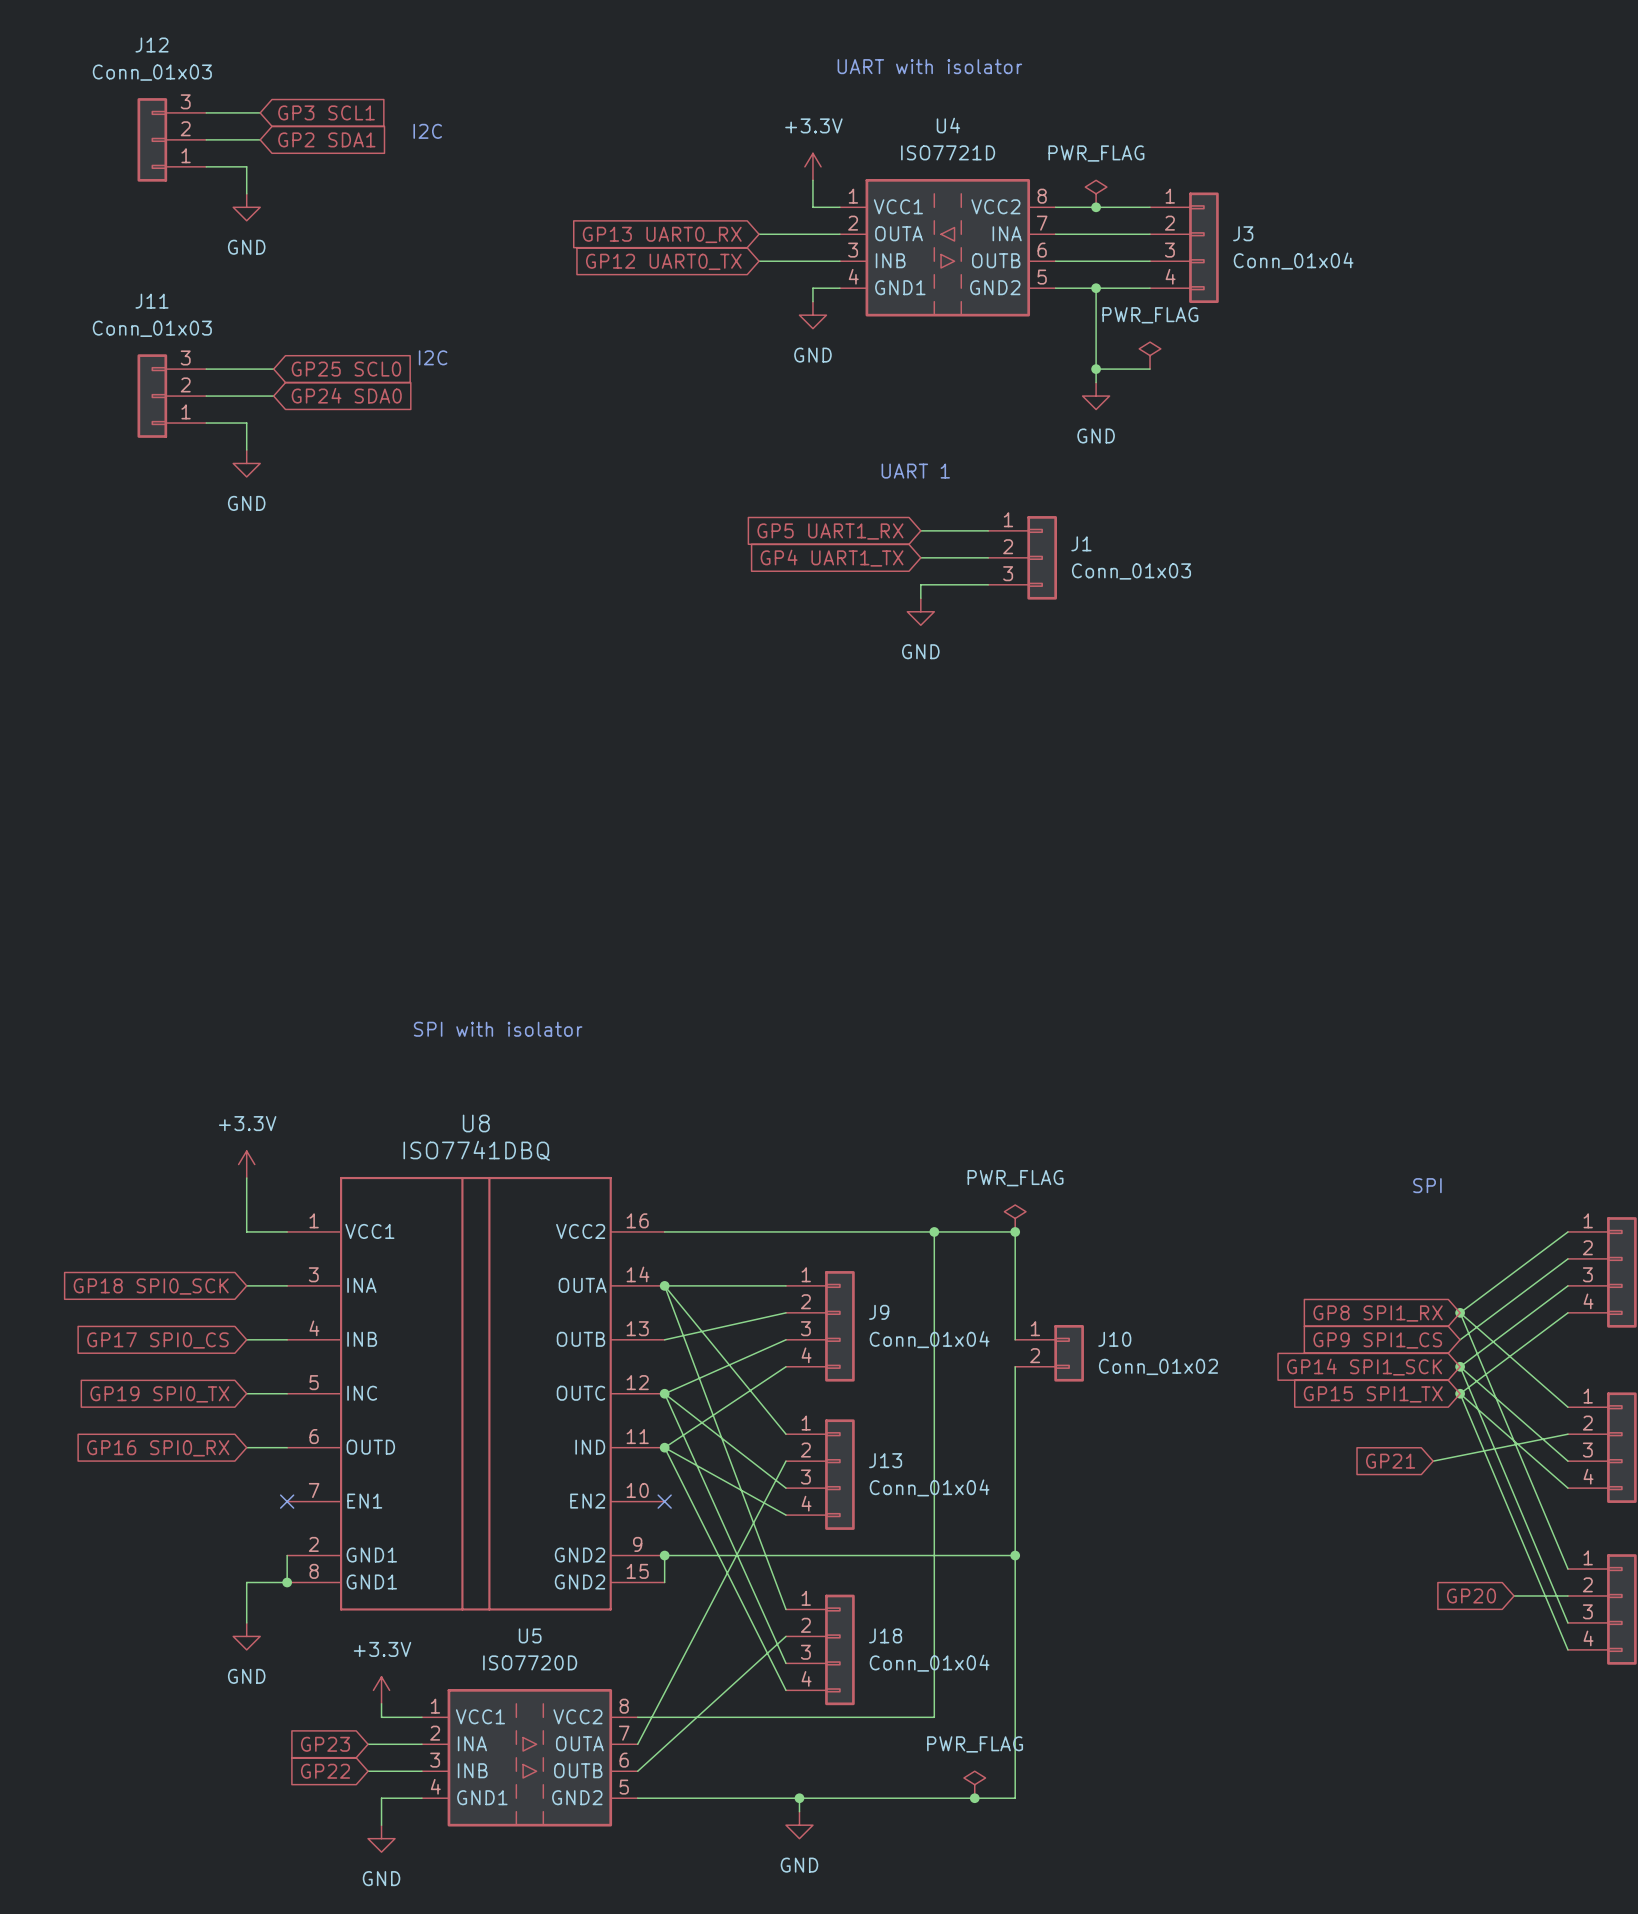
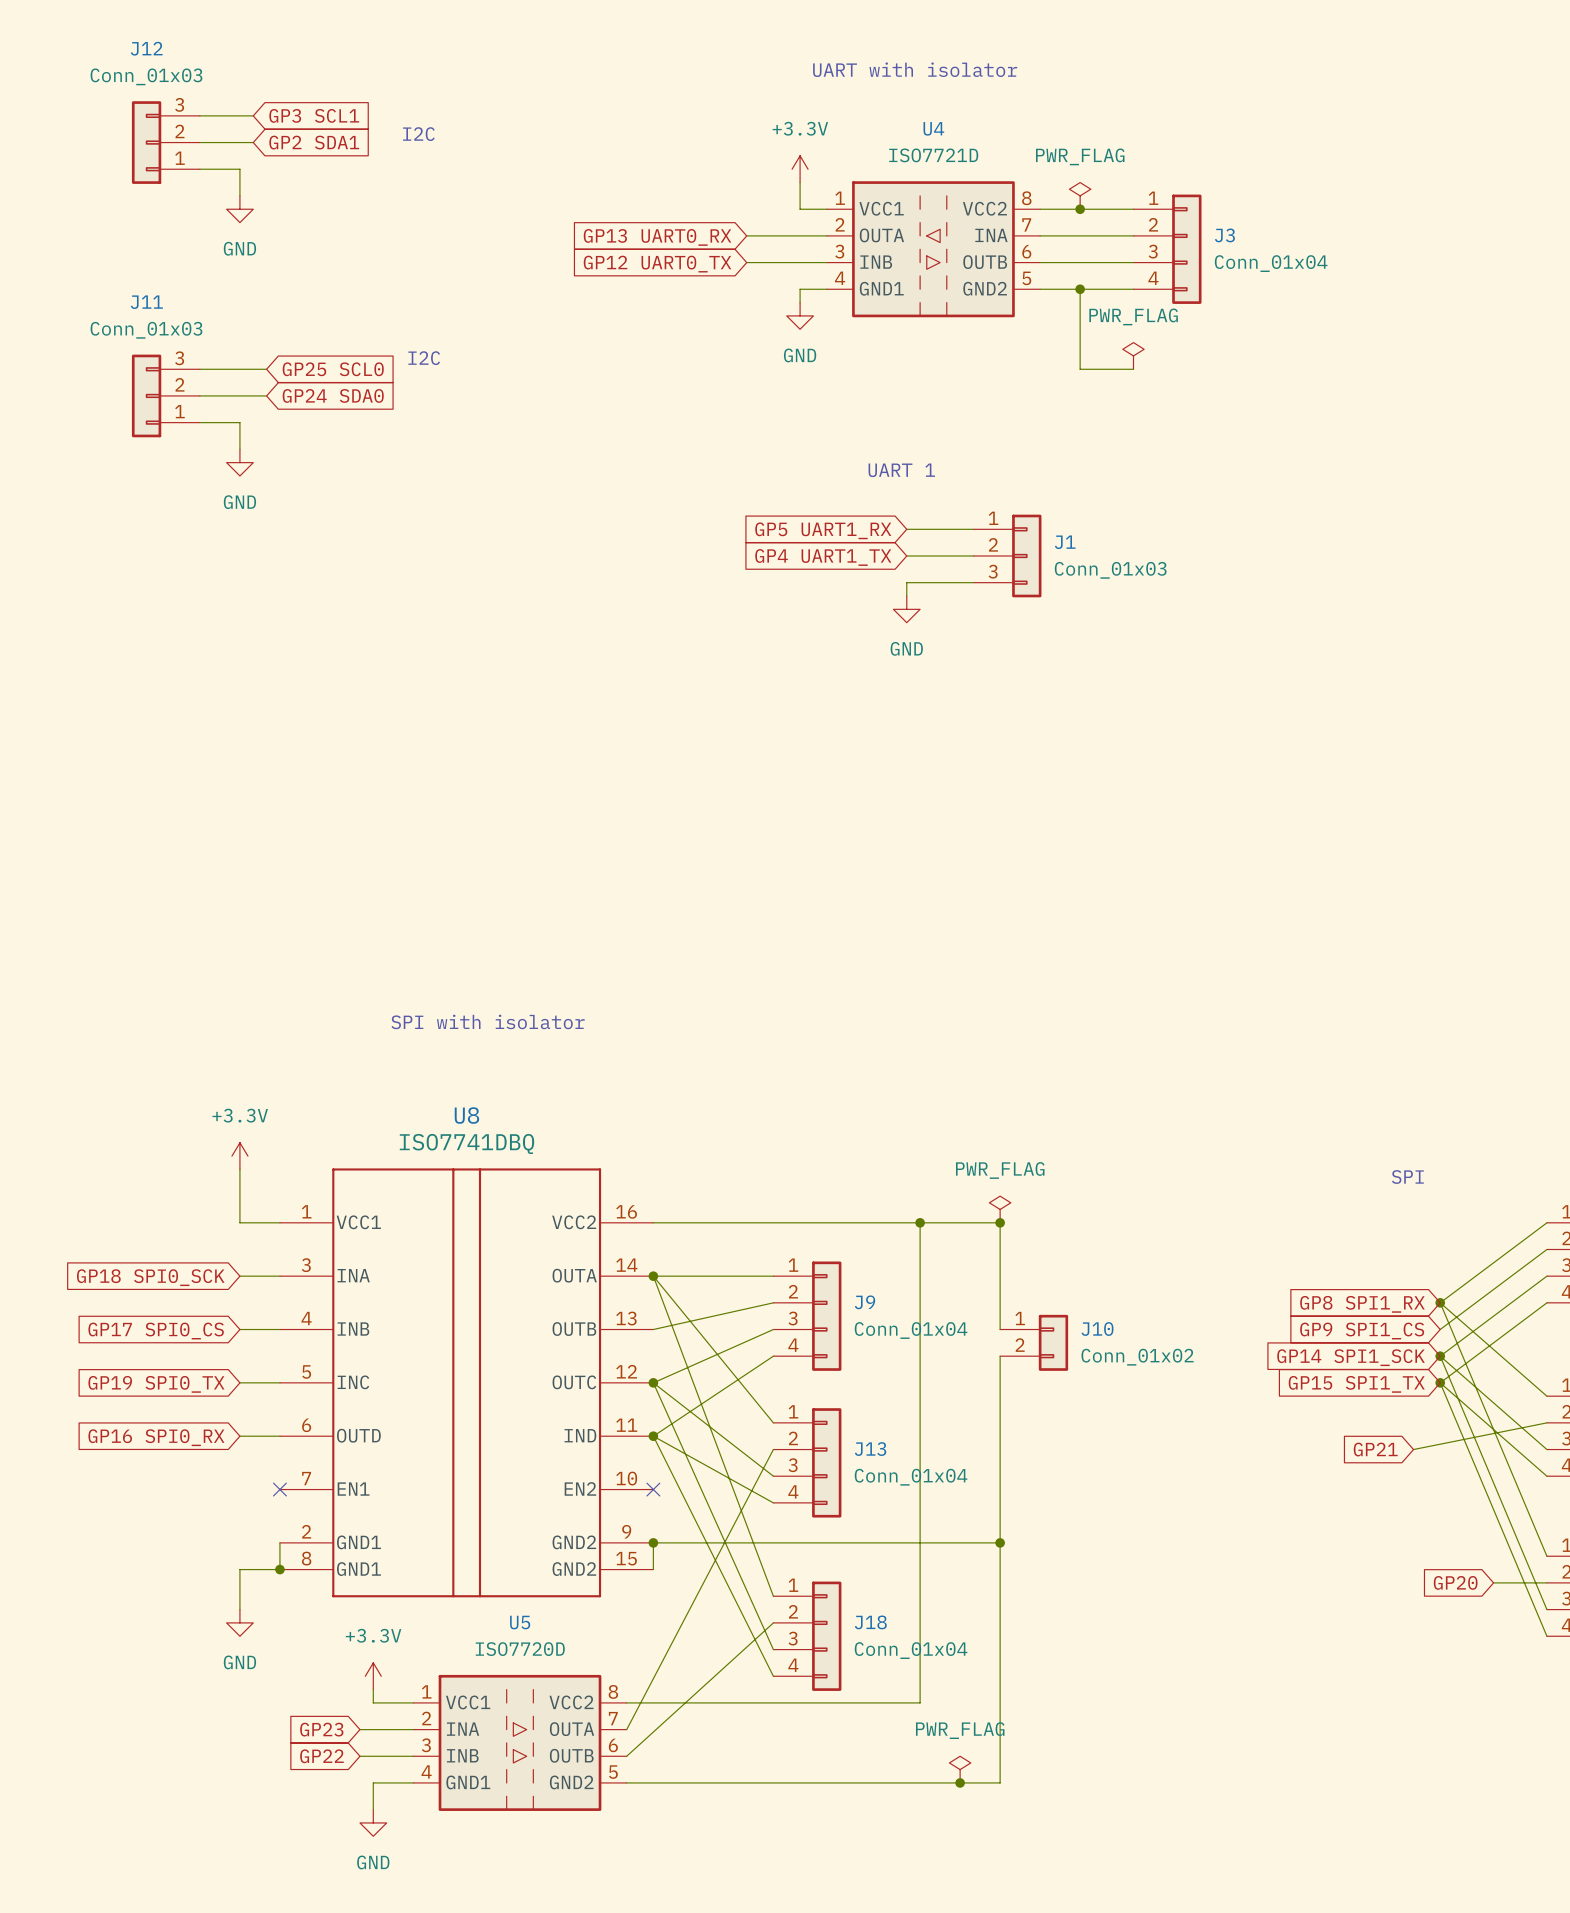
wire: (1096, 369) (1096, 382) -> none
junction: (1096, 369) -> none
power symbol: GND (1096, 396) -> none
wire: (799, 1798) (799, 1811) -> none
junction: (799, 1798) -> none
power symbol: GND (799, 1825) -> none

